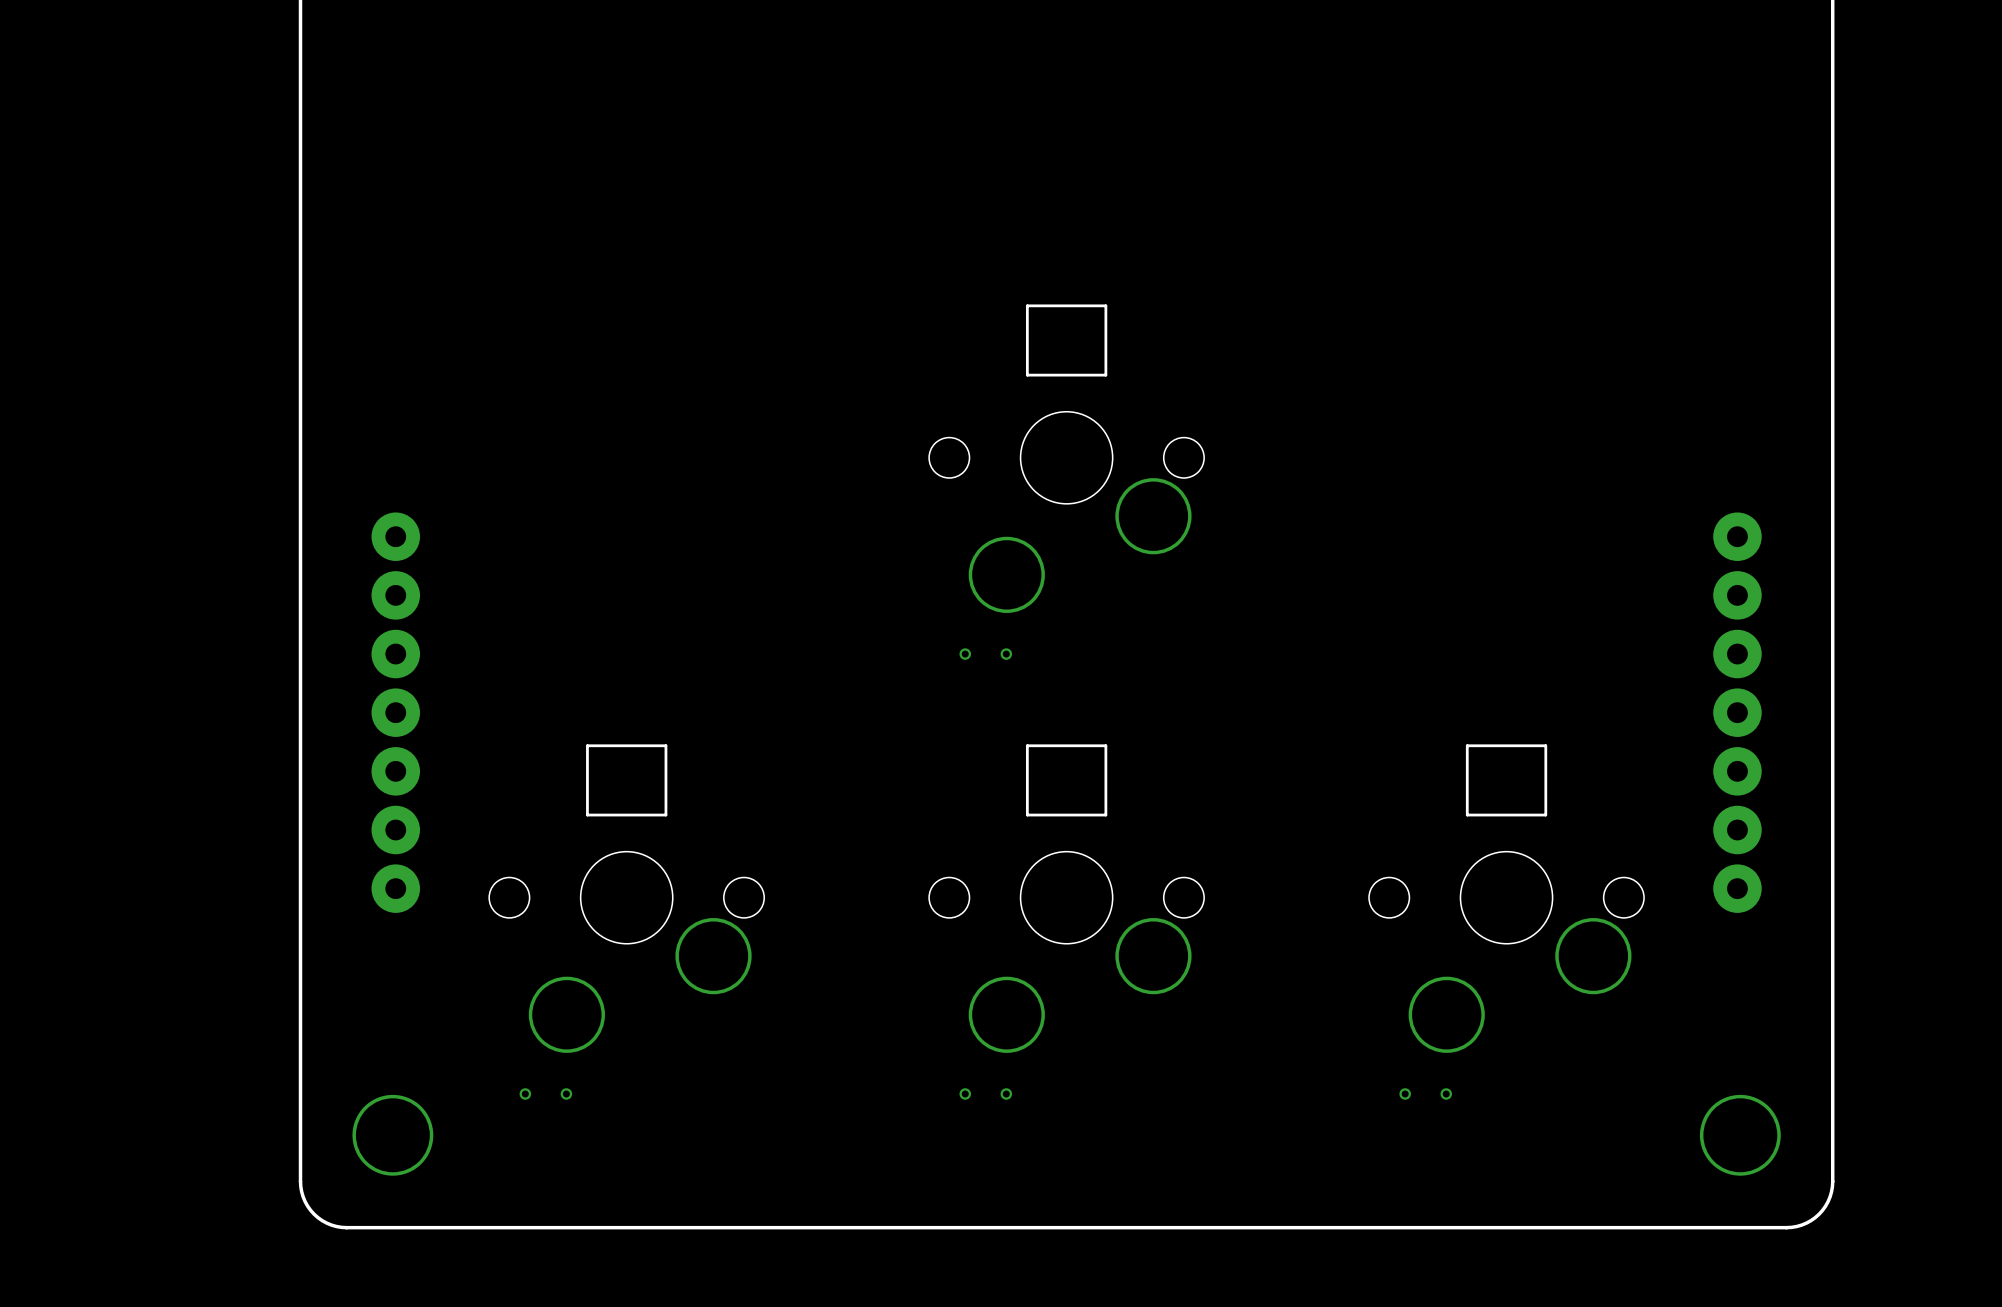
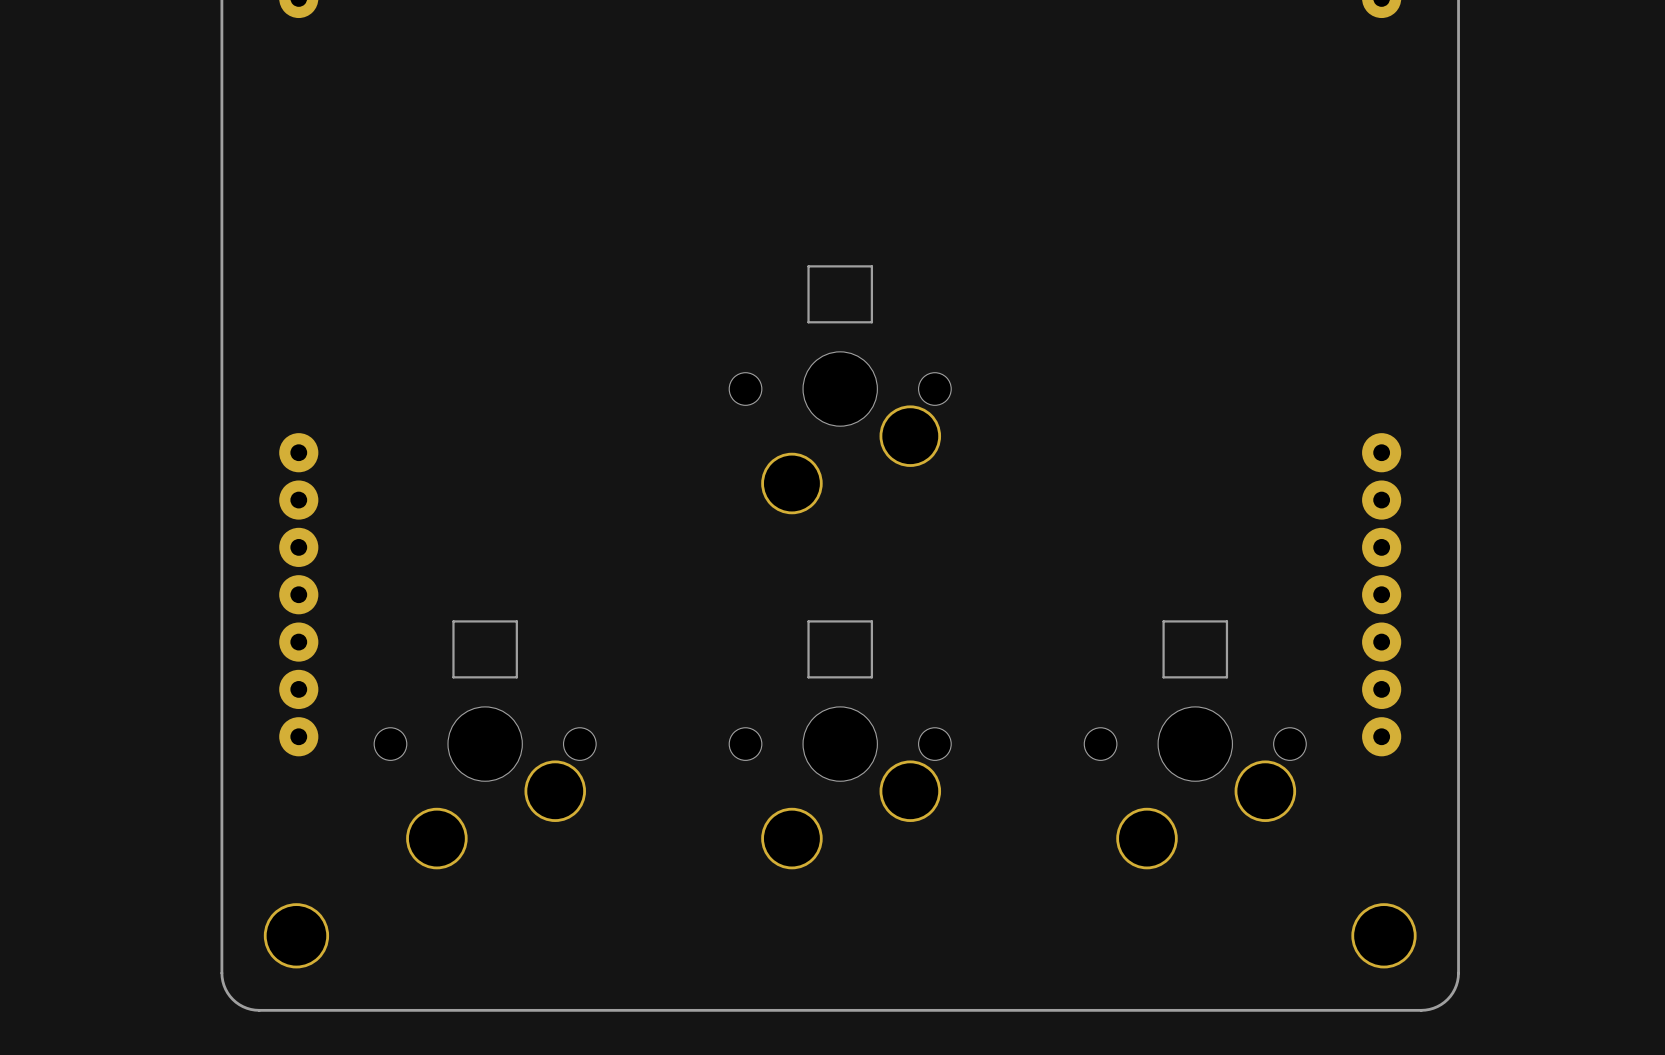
part: (985, 654) -> none
part: (545, 1094) -> none
part: (985, 1094) -> none
part: (1425, 1094) -> none

